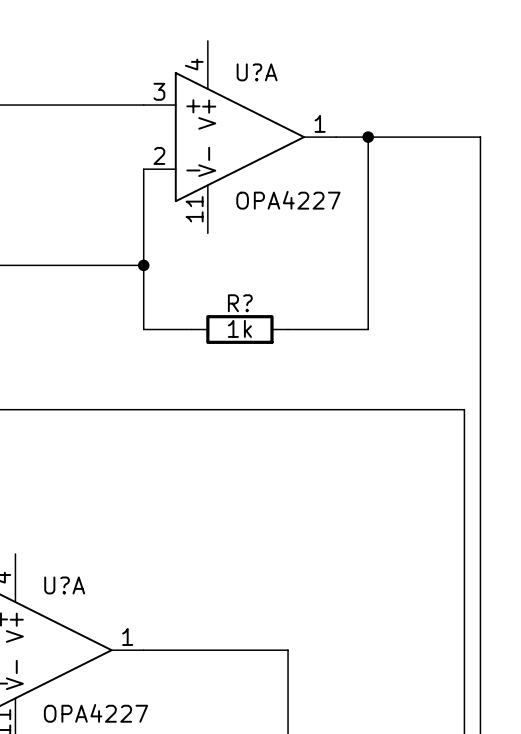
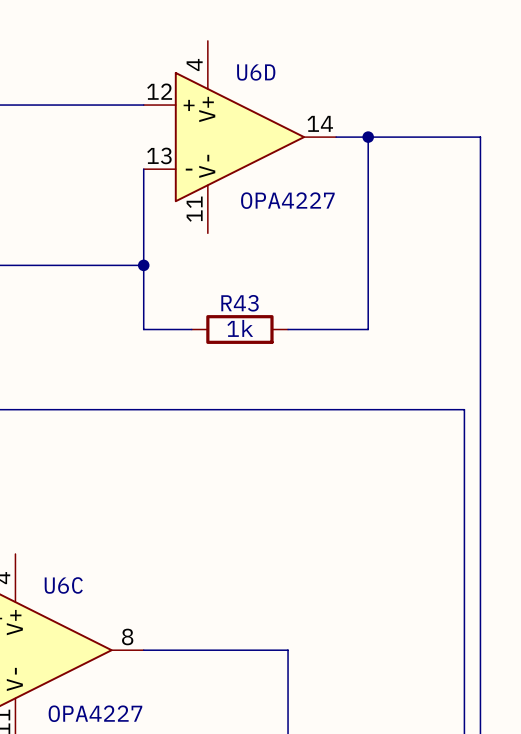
U?A name: U?A (257, 72) -> U6D (256, 72)
U?A pin number: 3 (159, 91) -> 12 (159, 91)
U?A pin number: 1 (320, 123) -> 14 (320, 123)
U?A pin number: 2 (159, 155) -> 13 (159, 155)
R? name: R? (240, 303) -> R43 (240, 303)
U?A name: U?A (64, 585) -> U6C (63, 585)
U?A pin number: 1 (127, 636) -> 8 (127, 636)

